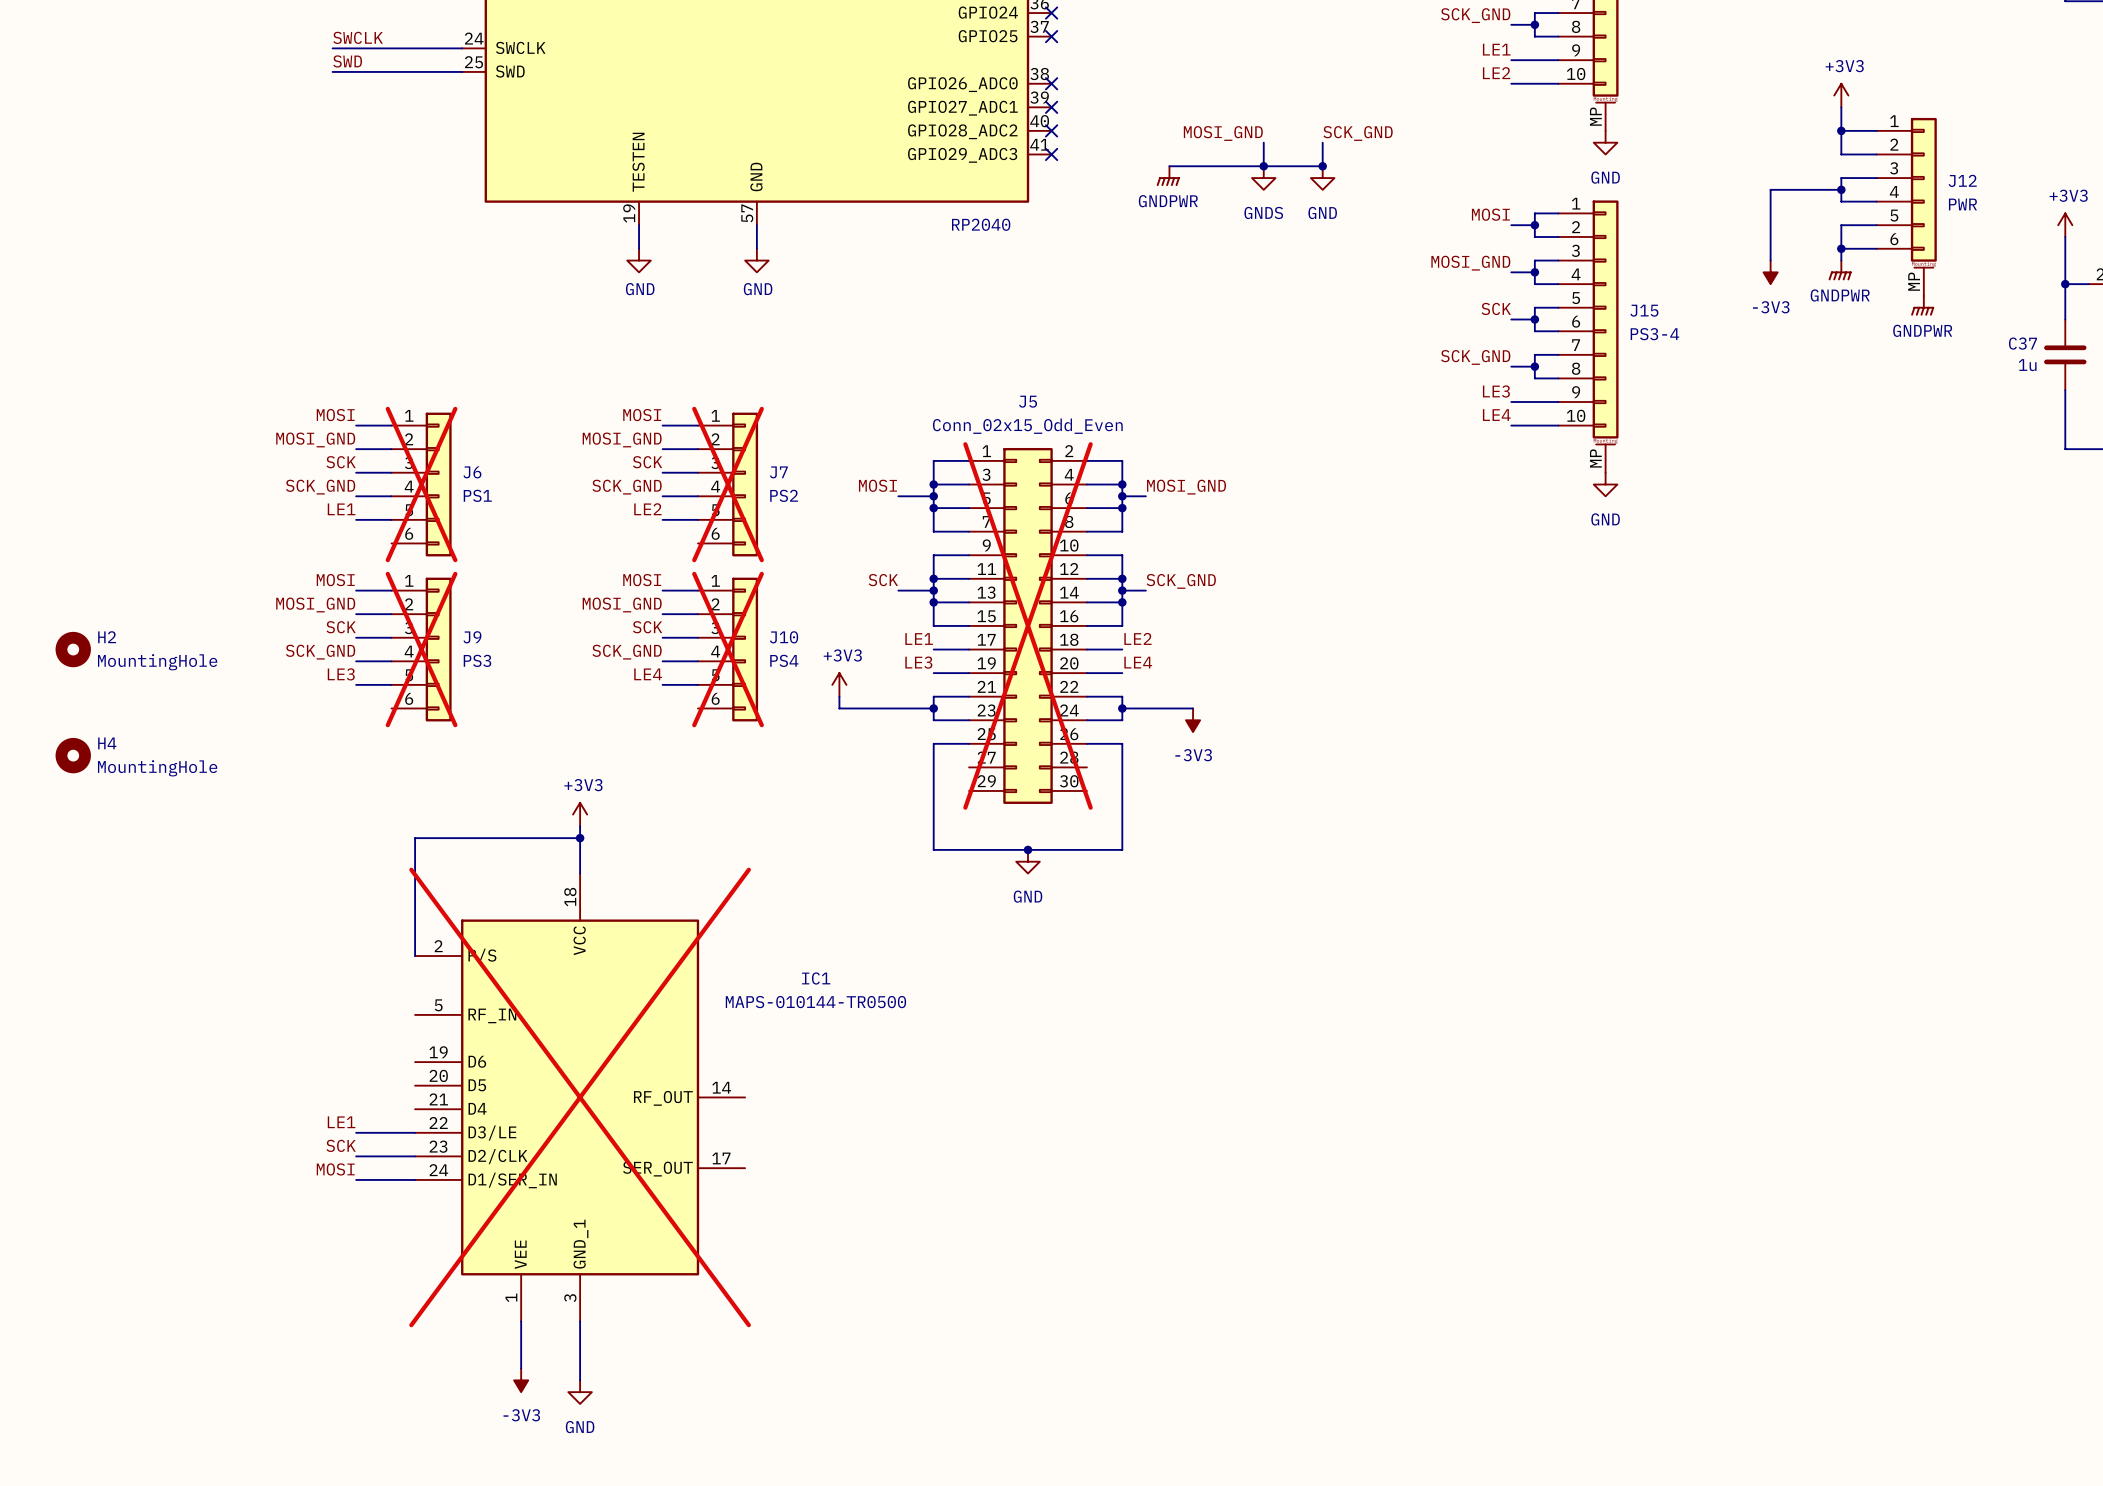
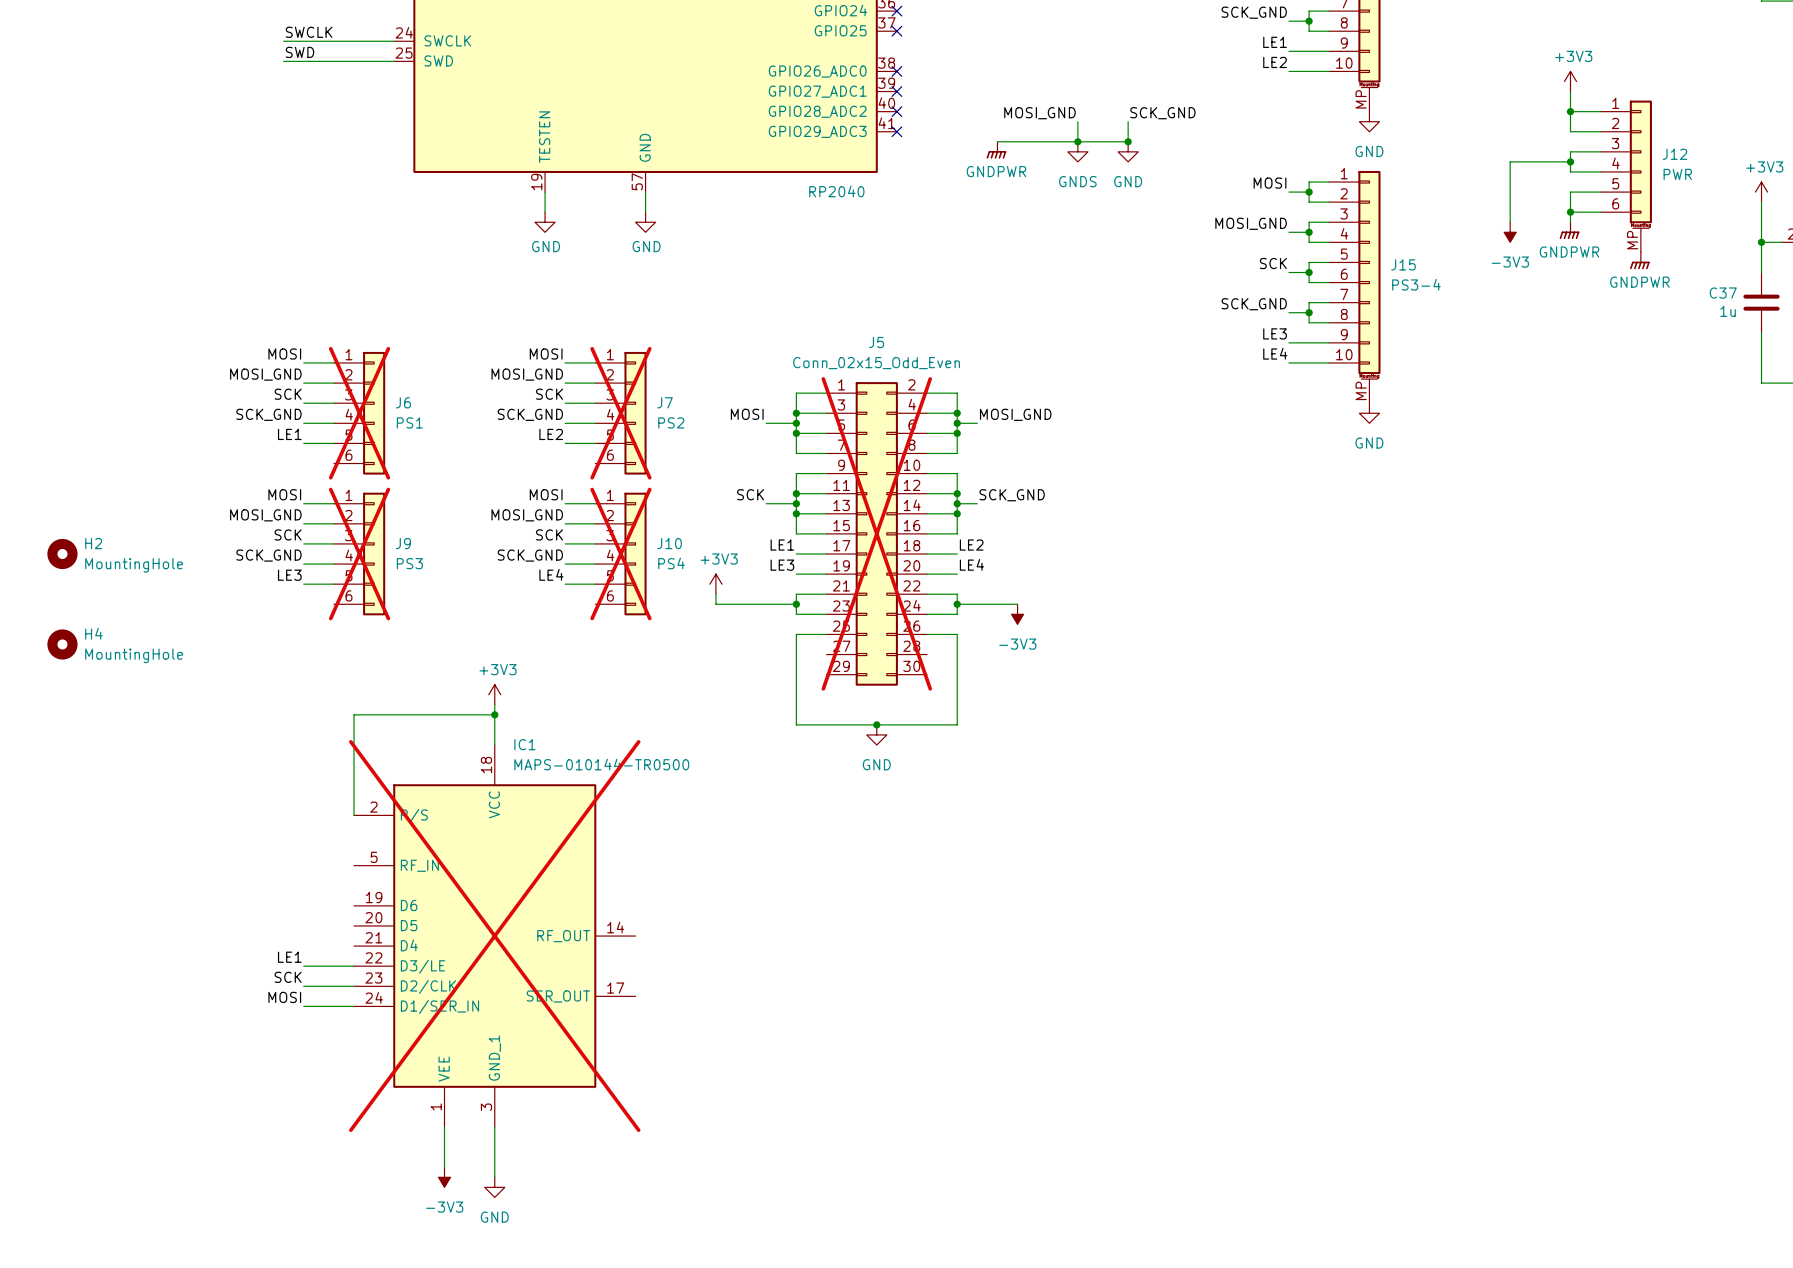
IC1 name position: IC1 (816, 978) -> IC1 (524, 744)
IC1 value position: MAPS-010144-TR0500 (815, 1002) -> MAPS-010144-TR0500 (601, 764)

